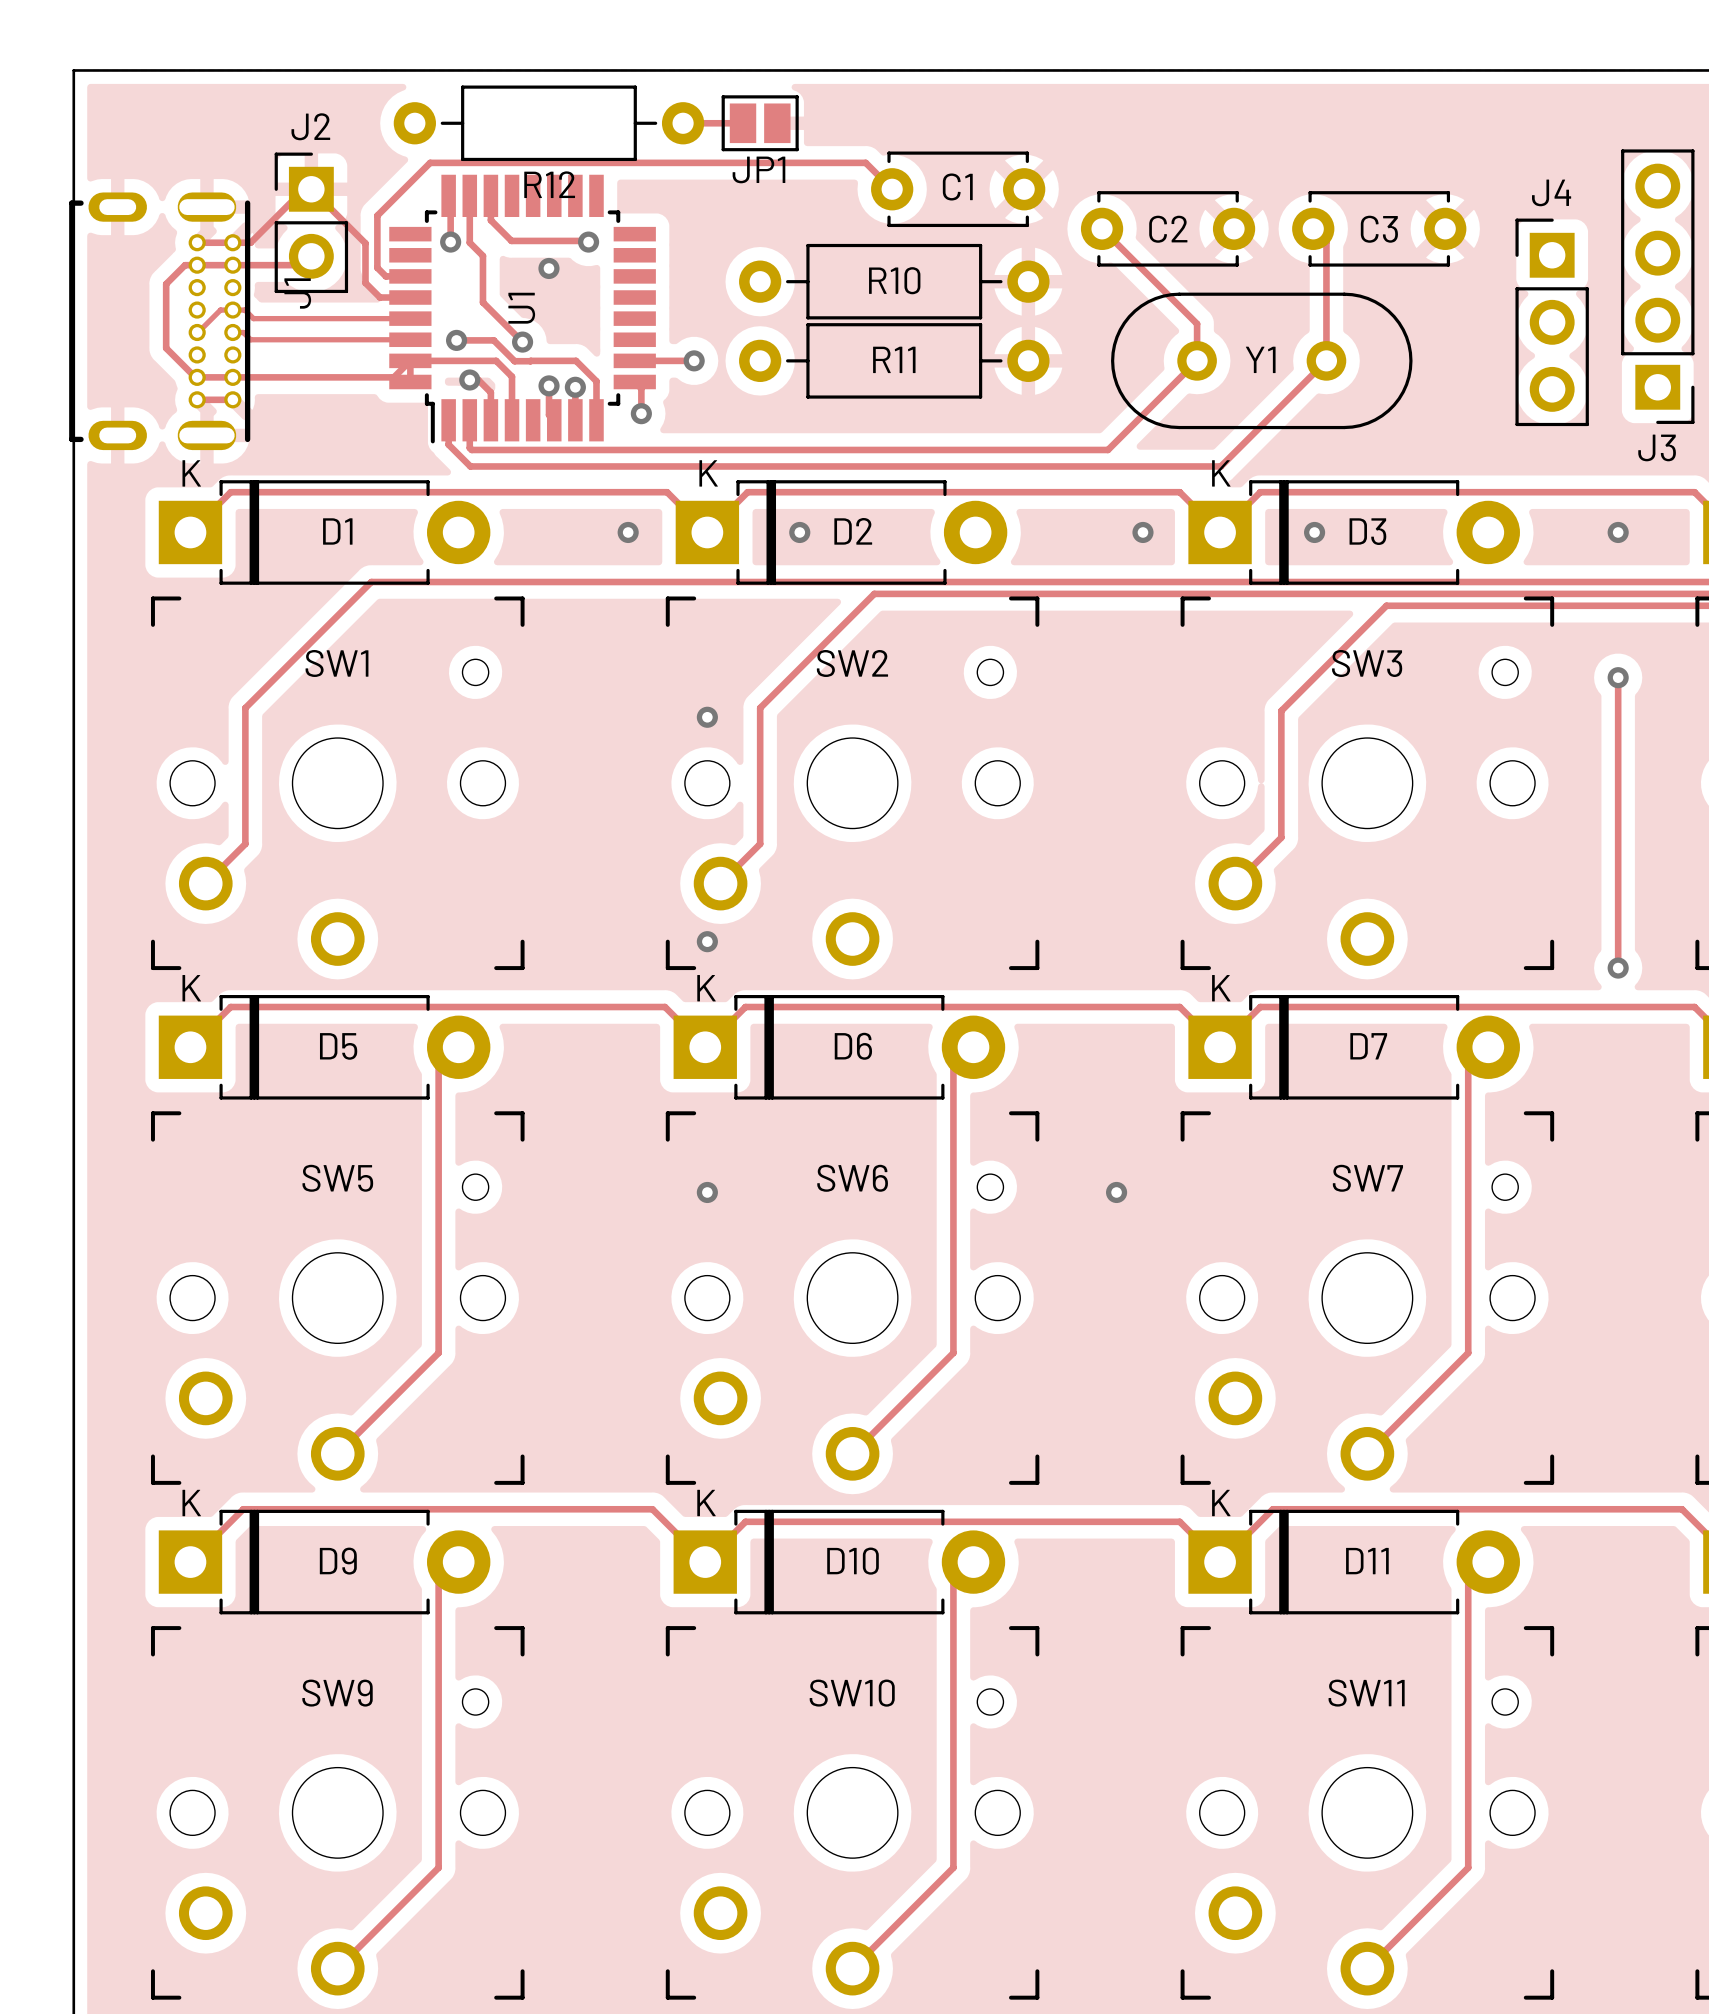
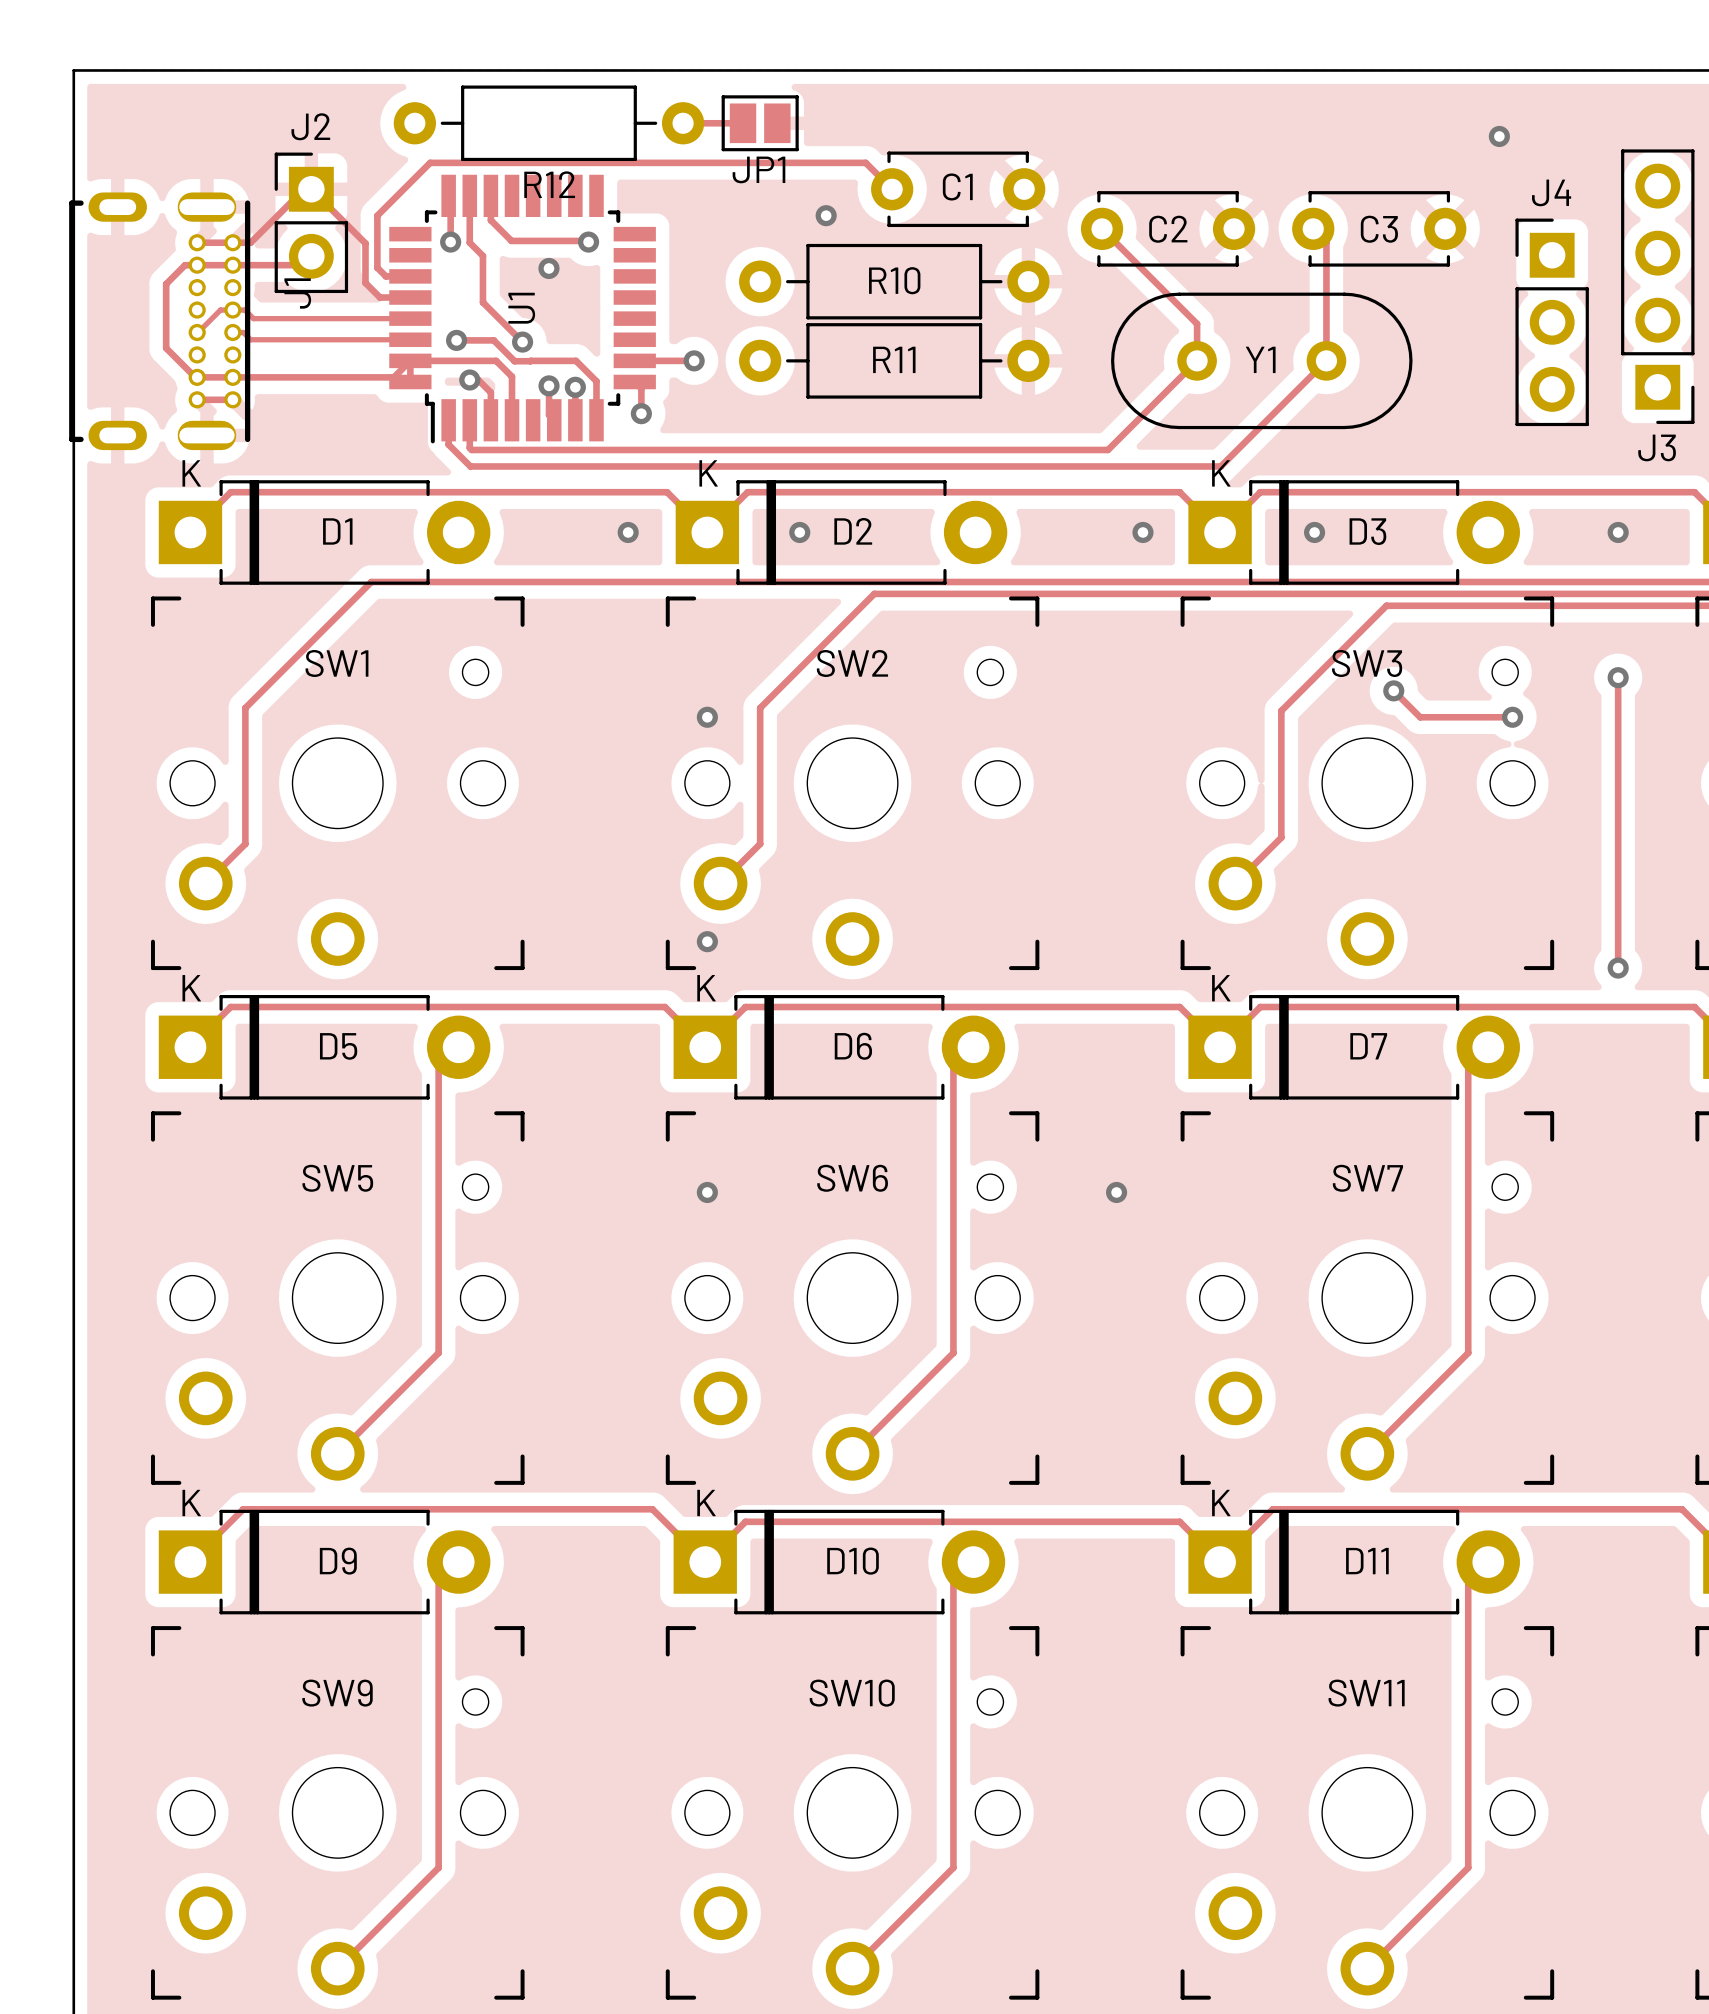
via: none -> (1499, 136)
via: none -> (826, 215)
track: none -> (1393, 690) (1420, 717) (1512, 717)
via: none -> (1393, 690)
via: none -> (1512, 717)

